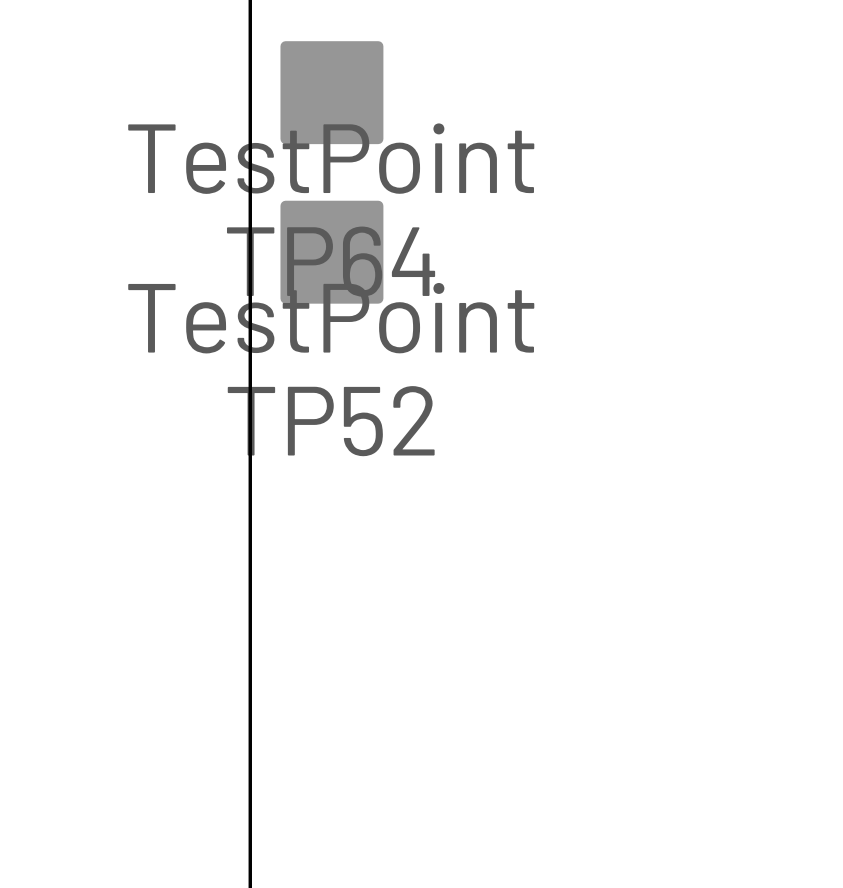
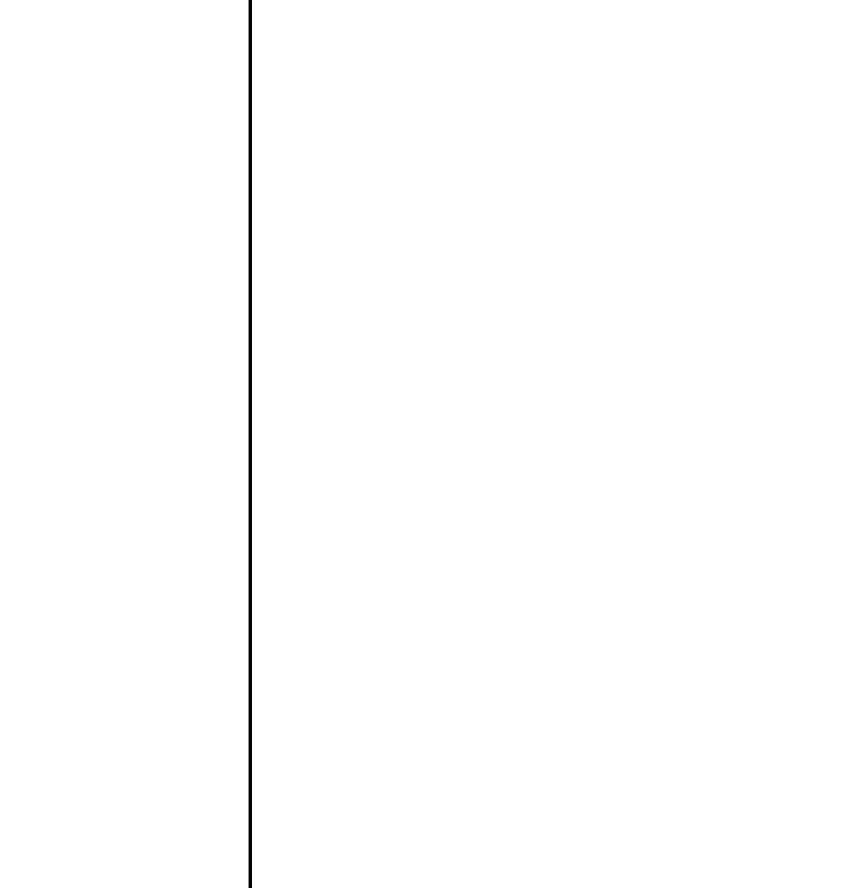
part: TestPoint (331, 92) -> none
TP52: TestPoint (331, 252) -> none

